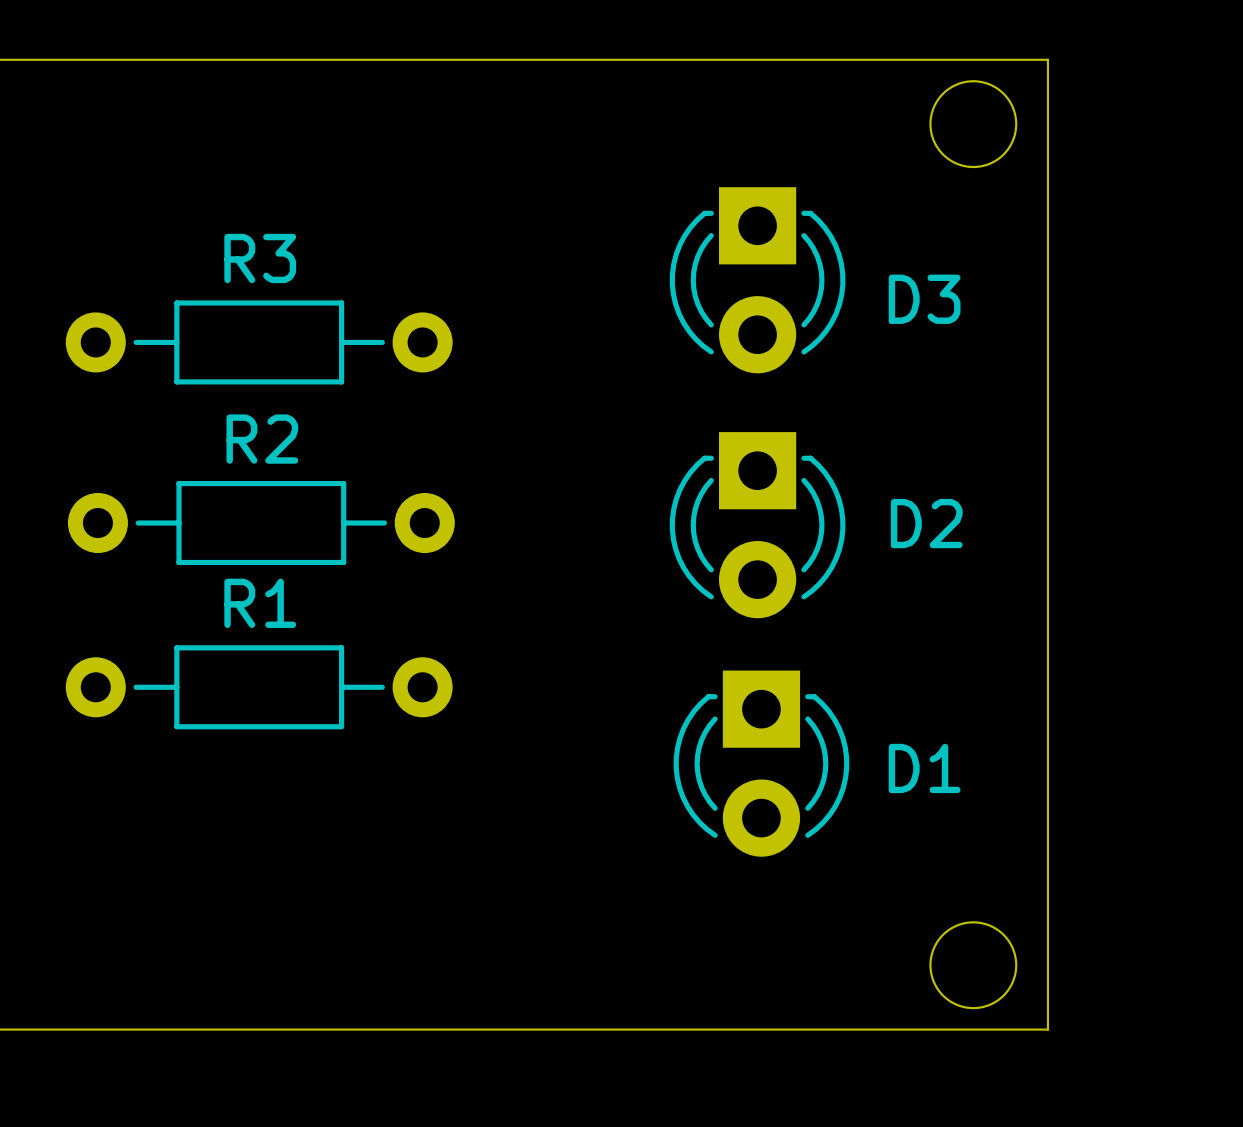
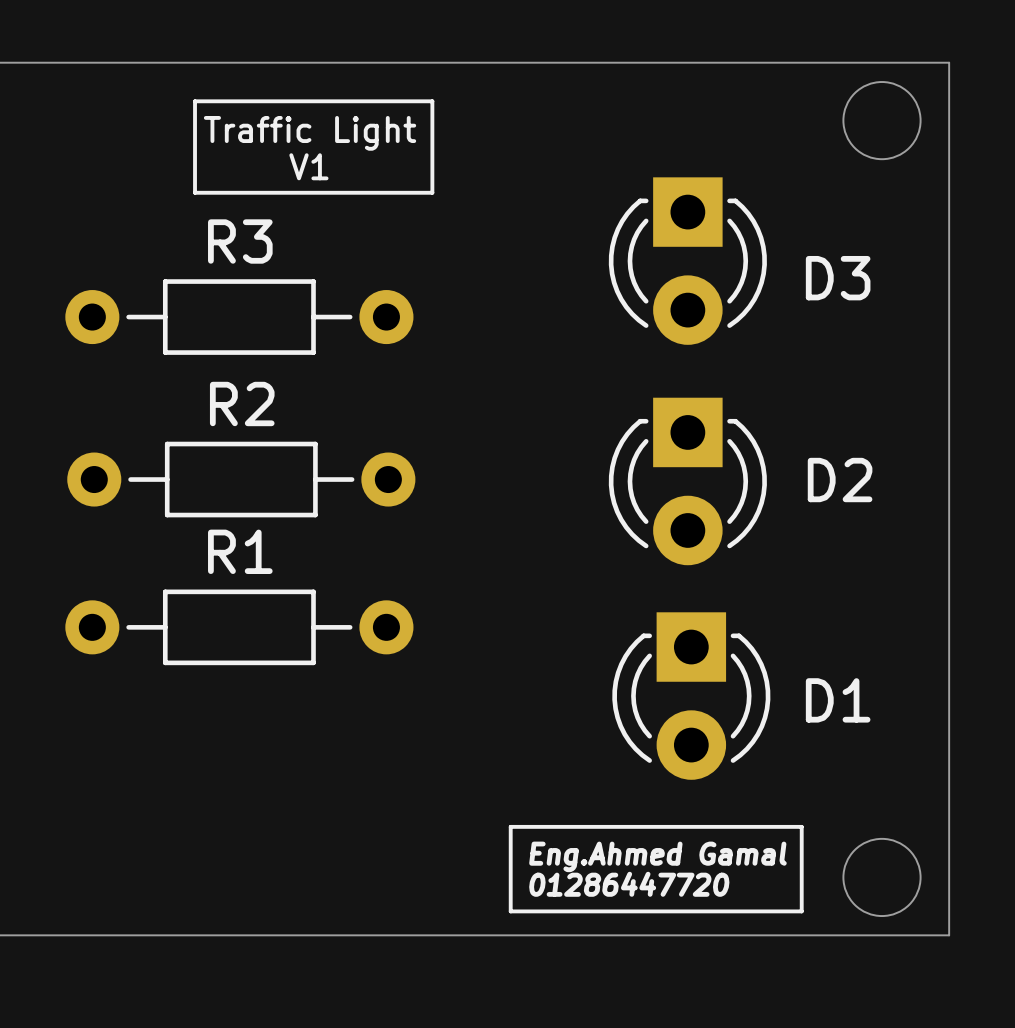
line: none -> (195, 101) (432, 101) (432, 192) (195, 192) (195, 101)
text: none -> Traffic Light (310, 133)
text: none -> V1 (308, 166)
line: none -> (510, 826) (801, 826) (801, 911) (510, 911) (510, 826)
text: none -> Eng.Ahmed Gamal (657, 856)
text: none -> 01286447720 (629, 884)

